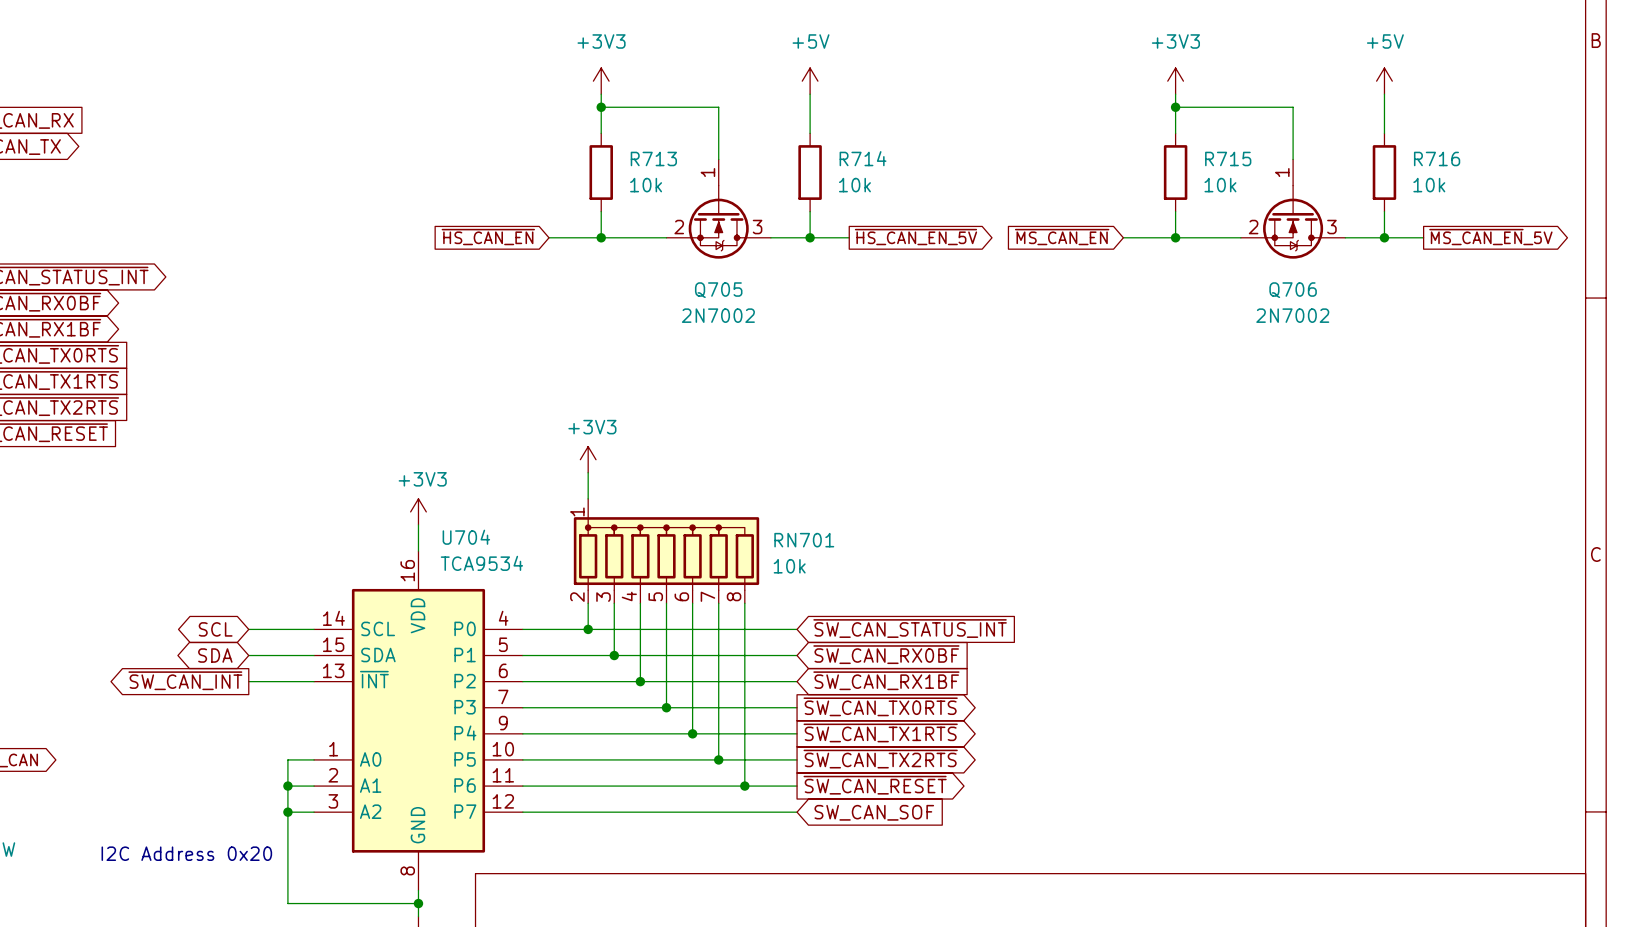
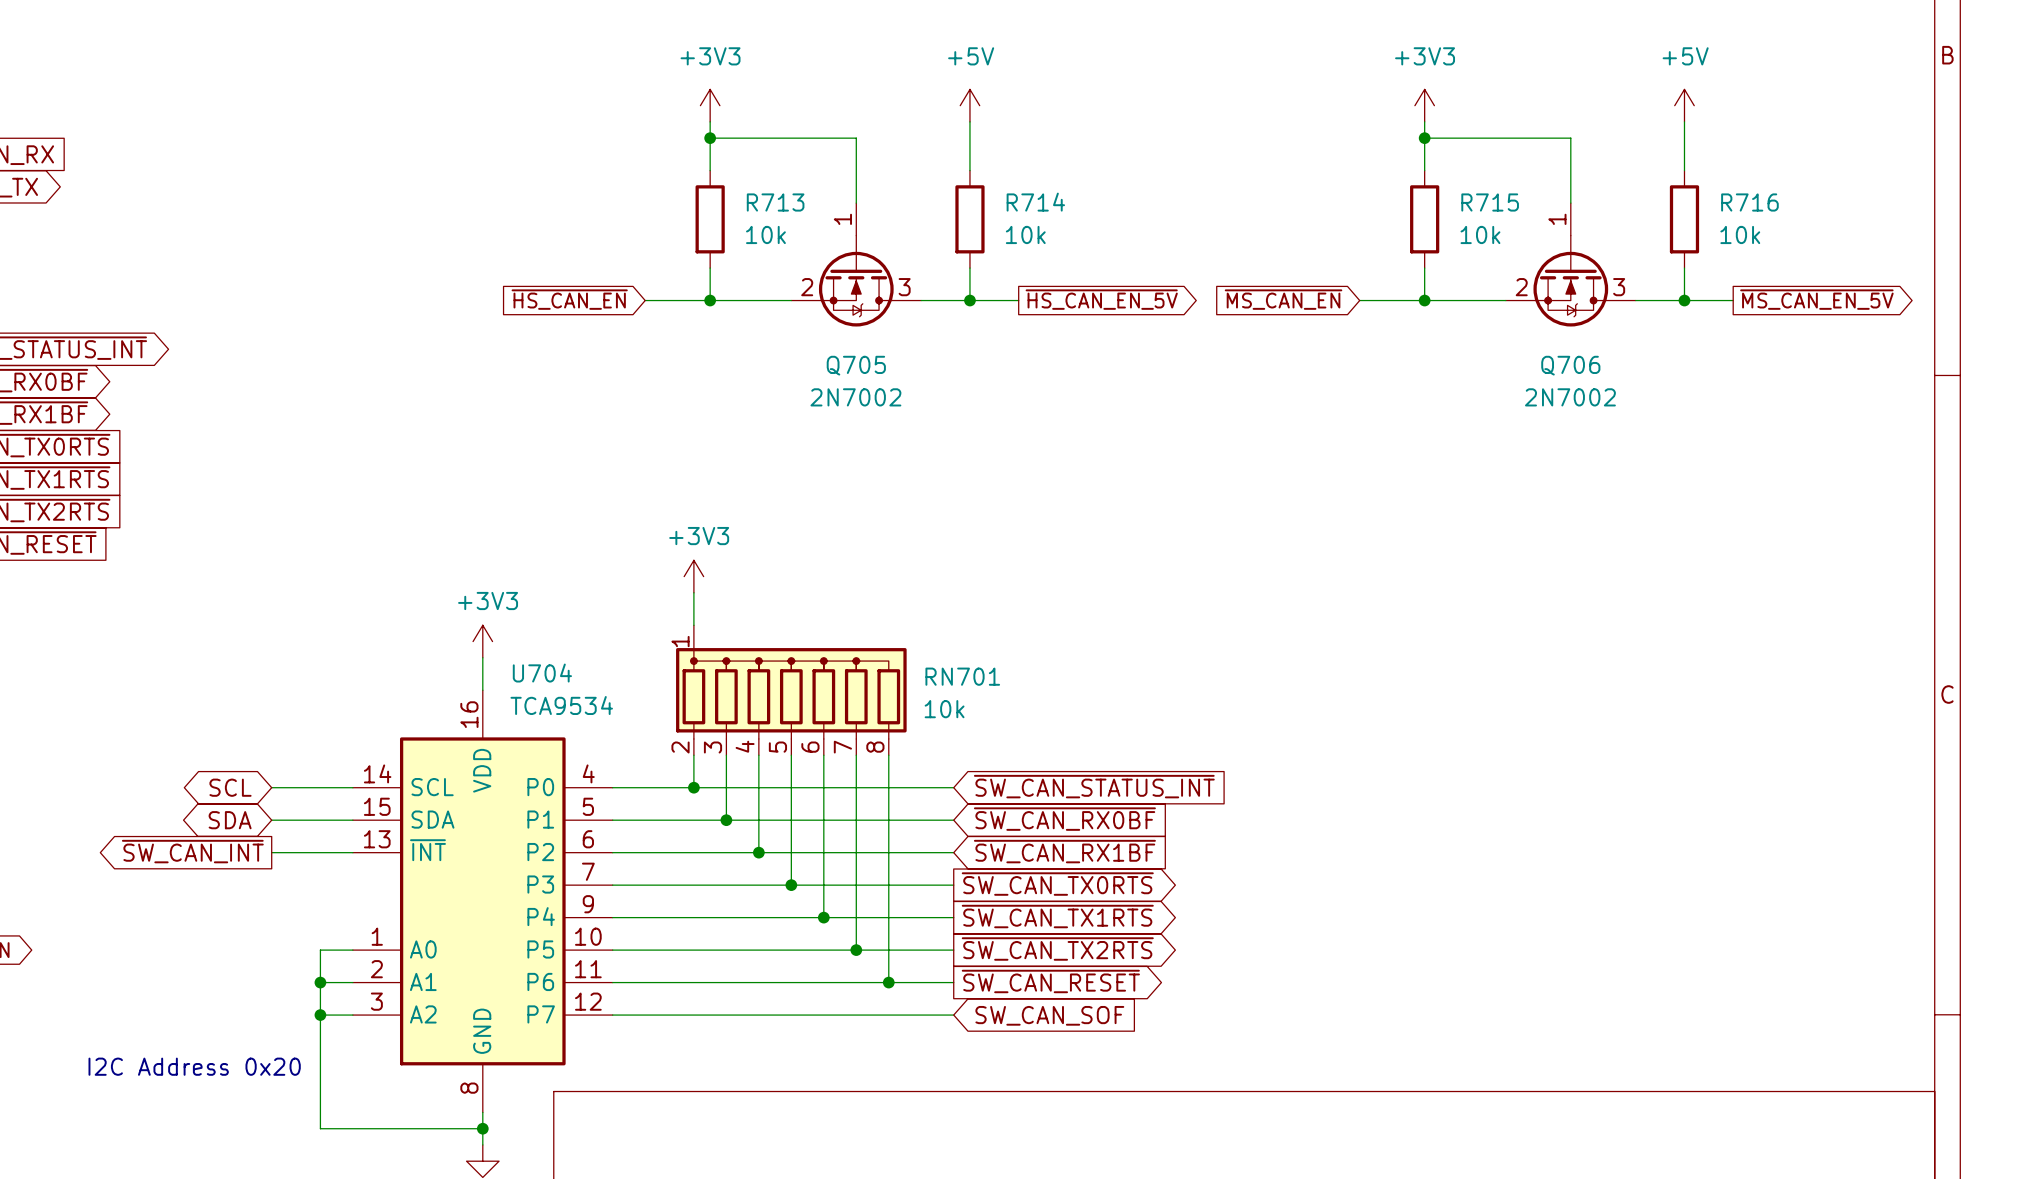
global label: ~{MS_CAN_EN}_5V (1490, 237) -> ~{MS_CAN_EN_5V} (1816, 299)

